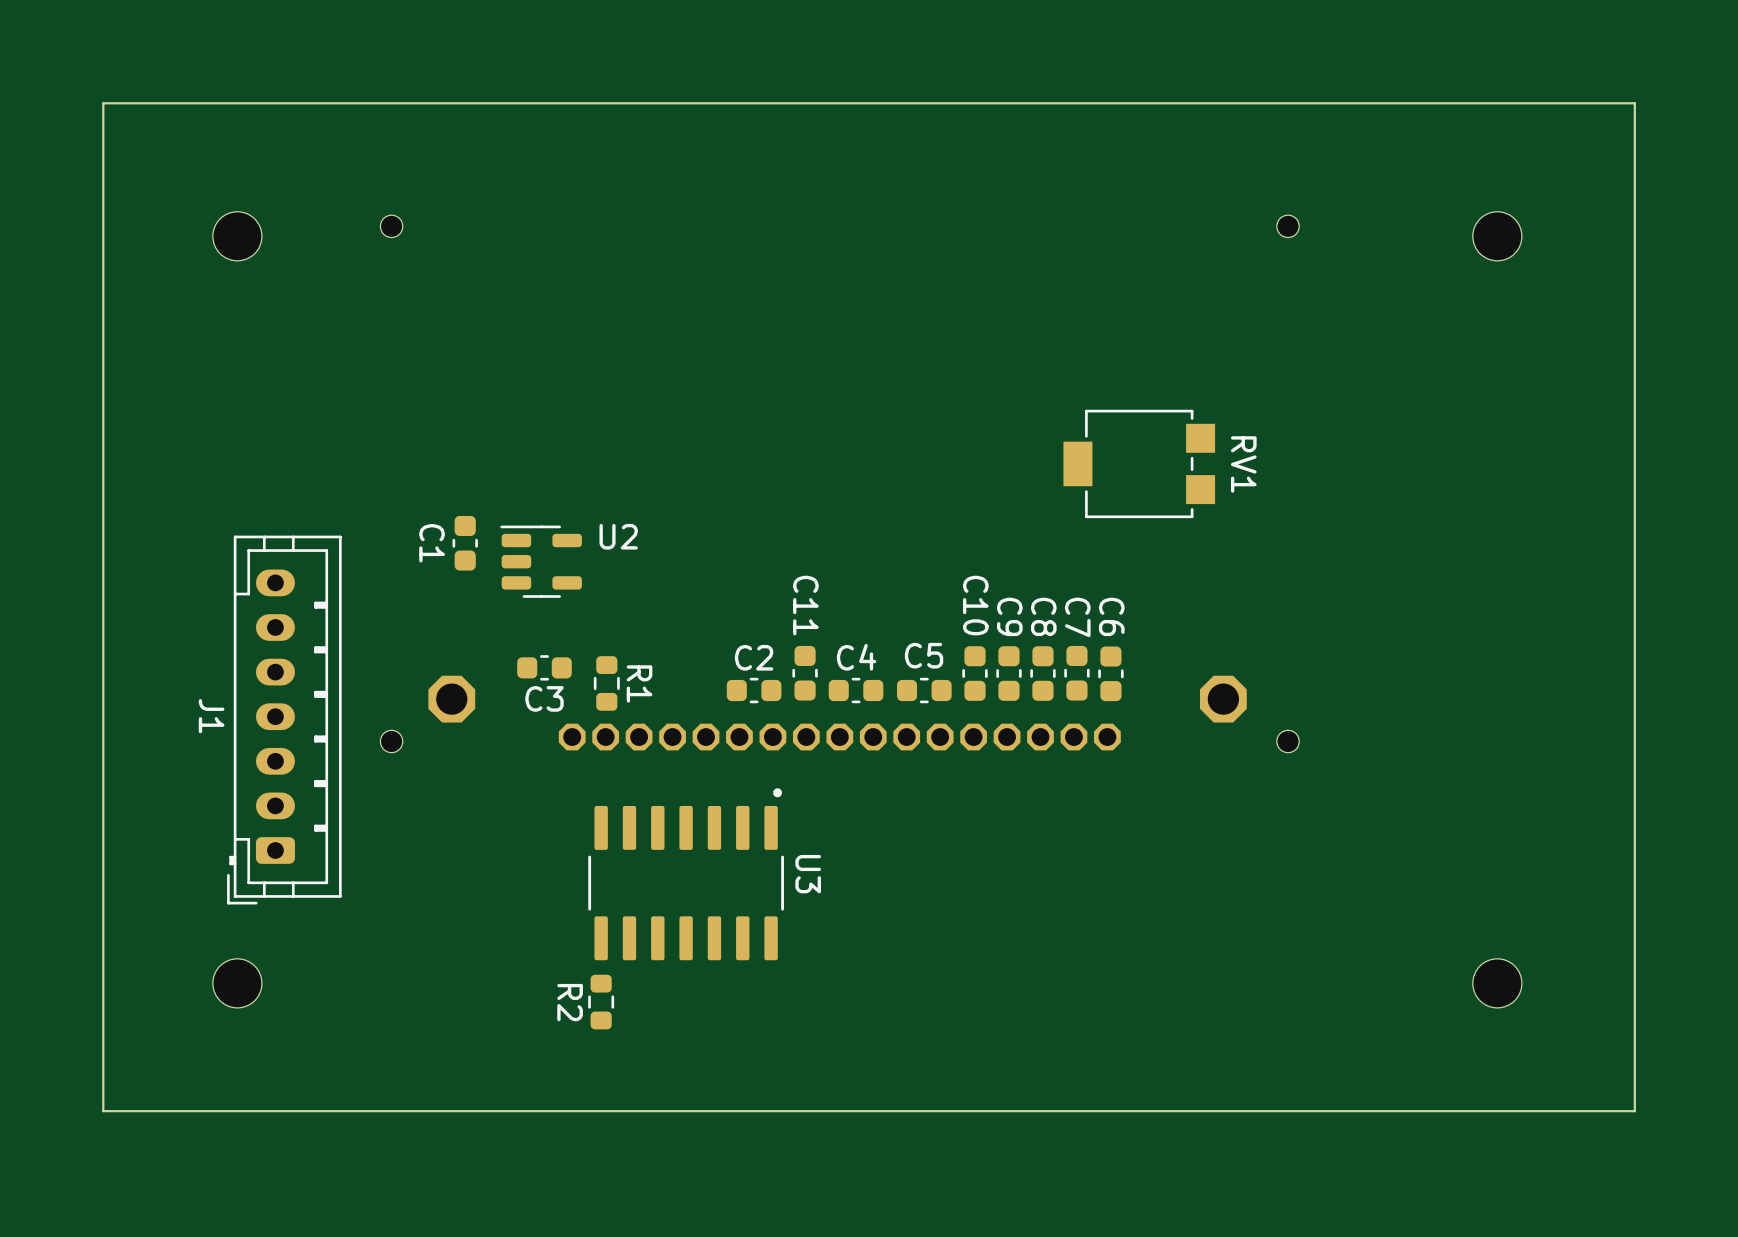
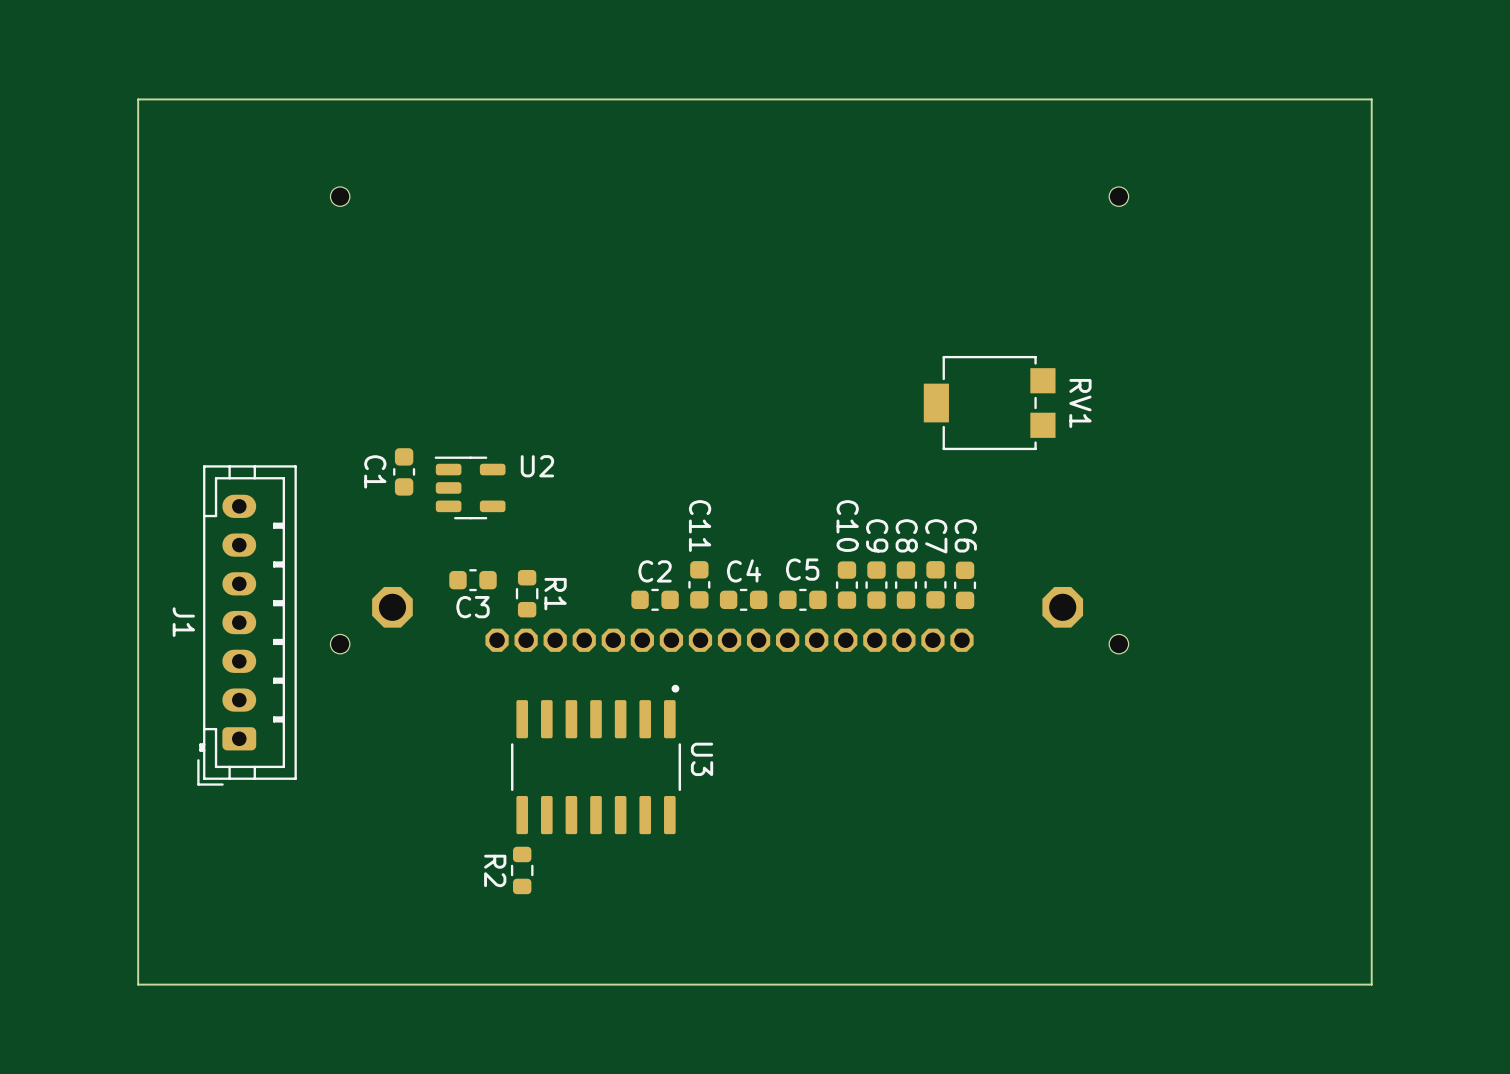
board edge: (1634, 103) (103, 103) (103, 1111) (1634, 1111) (1634, 103) -> (1371, 99) (1371, 984) (138, 984) (138, 99) (1371, 99)
part: (237, 236) -> none
part: (1497, 236) -> none
part: (237, 983) -> none
part: (1497, 983) -> none

